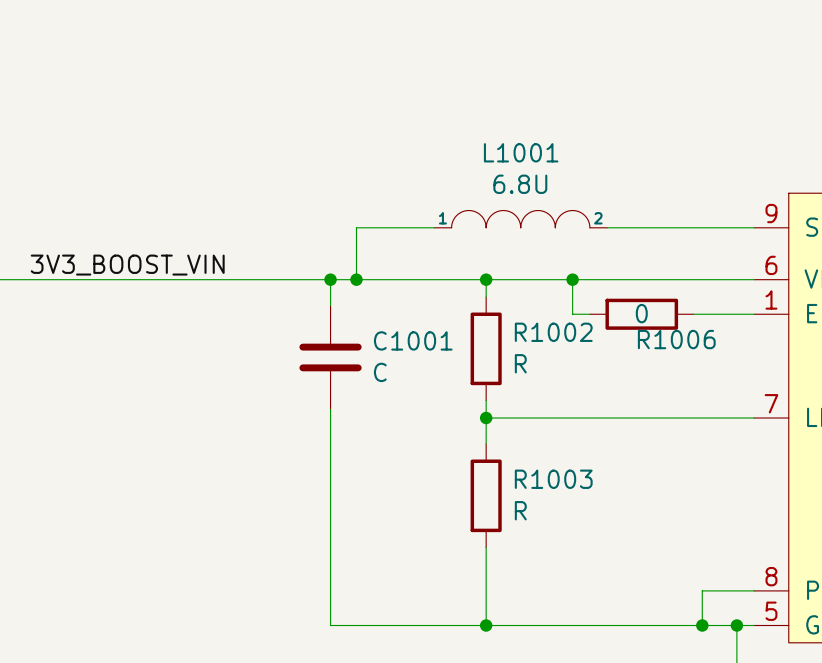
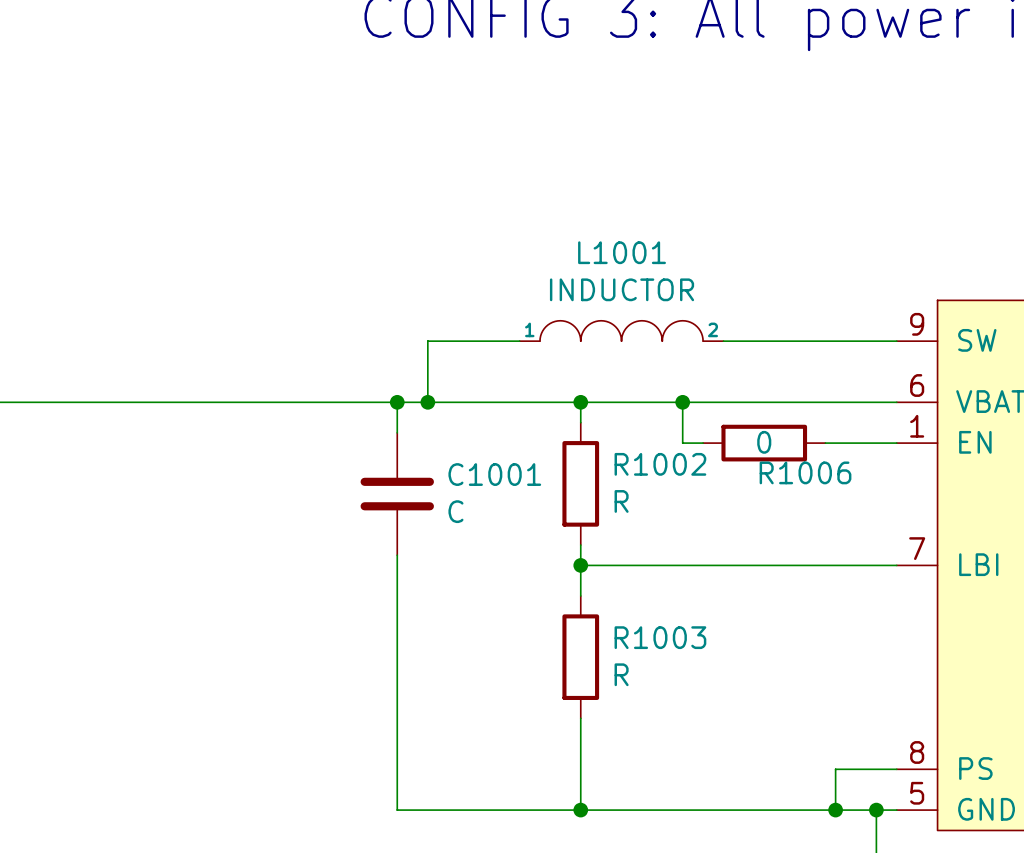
L1001 value: 6.8U (520, 184) -> INDUCTOR (622, 289)
label: 3V3_BOOST_VIN (127, 265) -> none

